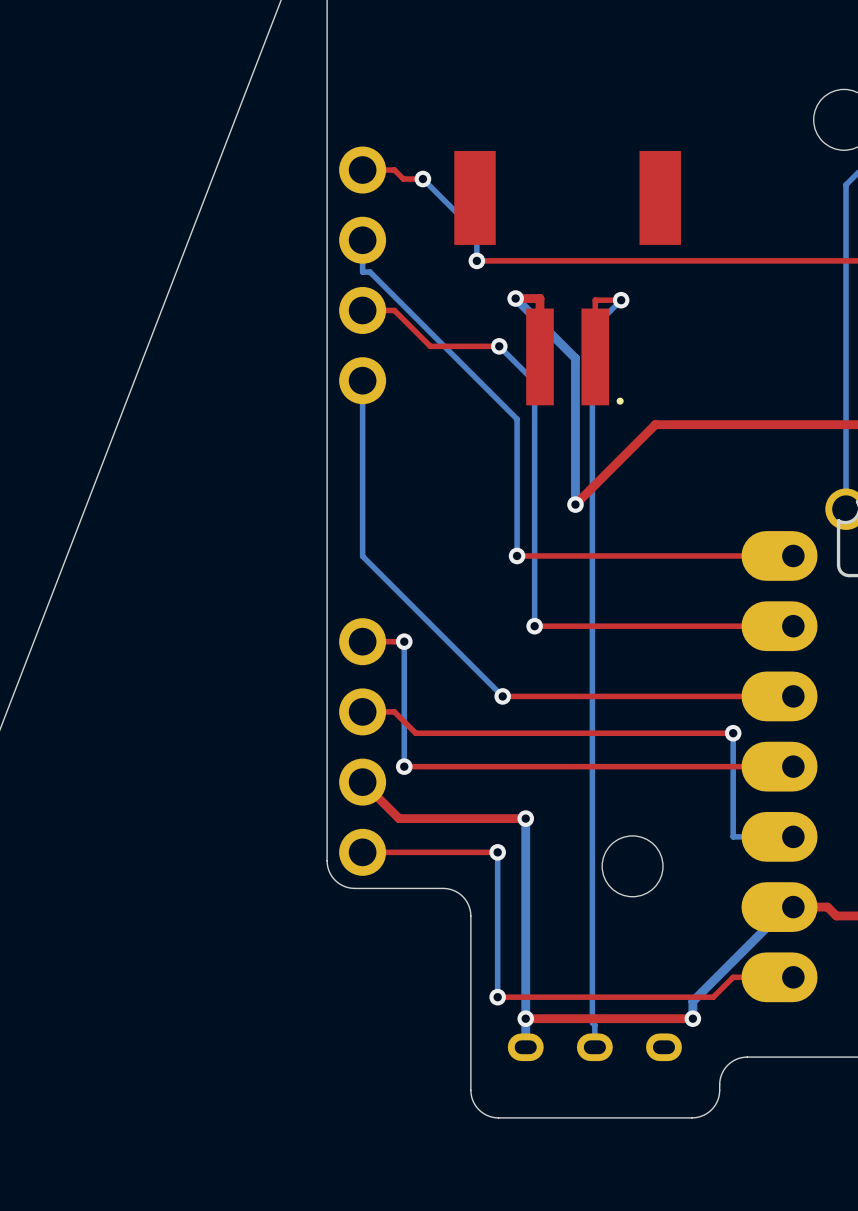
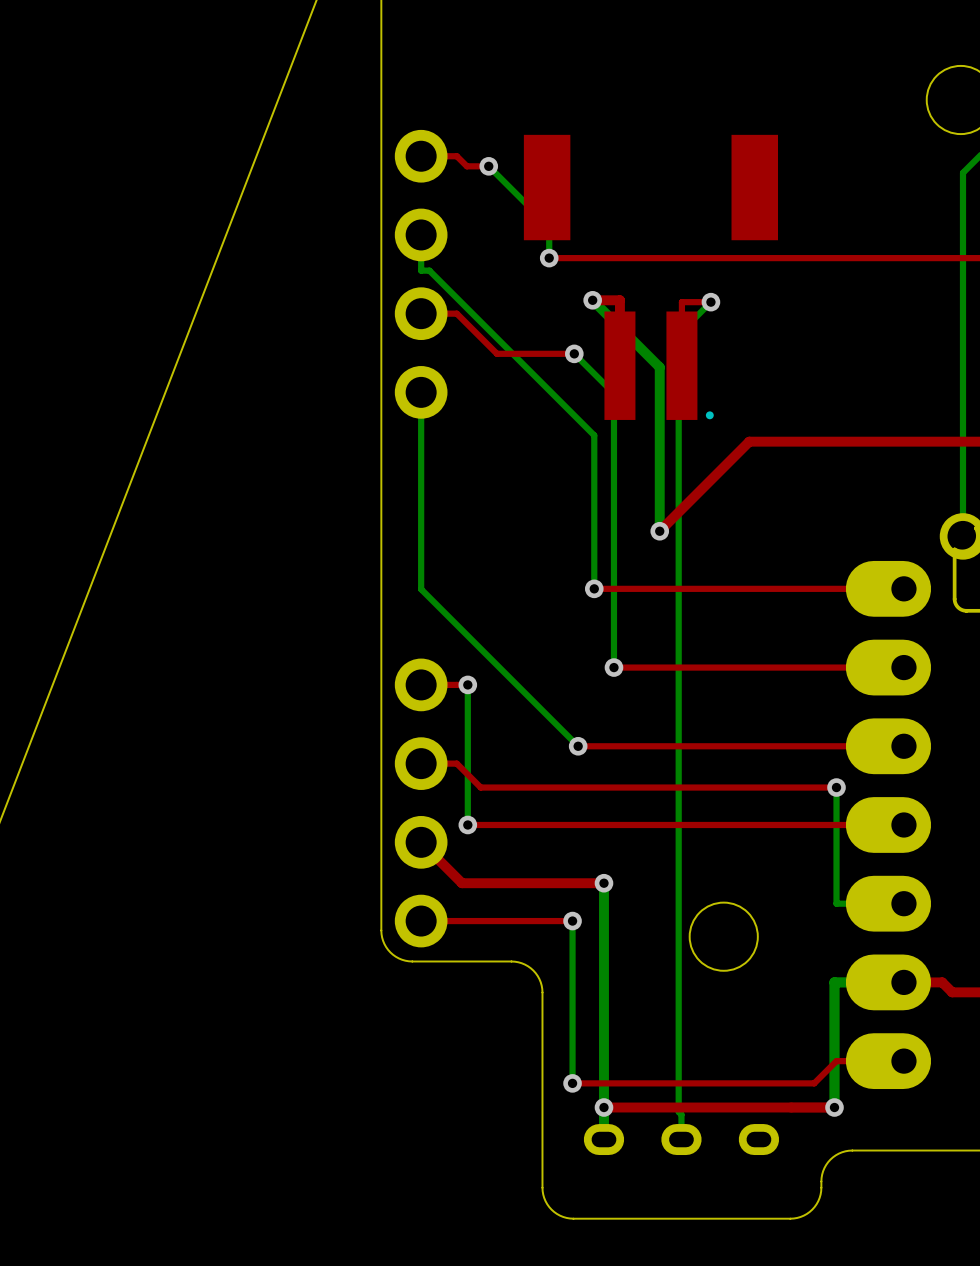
bottom track: (787, 907) (692, 1001) (692, 1018) -> (897, 982) (834, 982) (834, 1107)
top track: none -> (791, 1107) (834, 1107)
via position: (692, 1018) -> (834, 1107)

